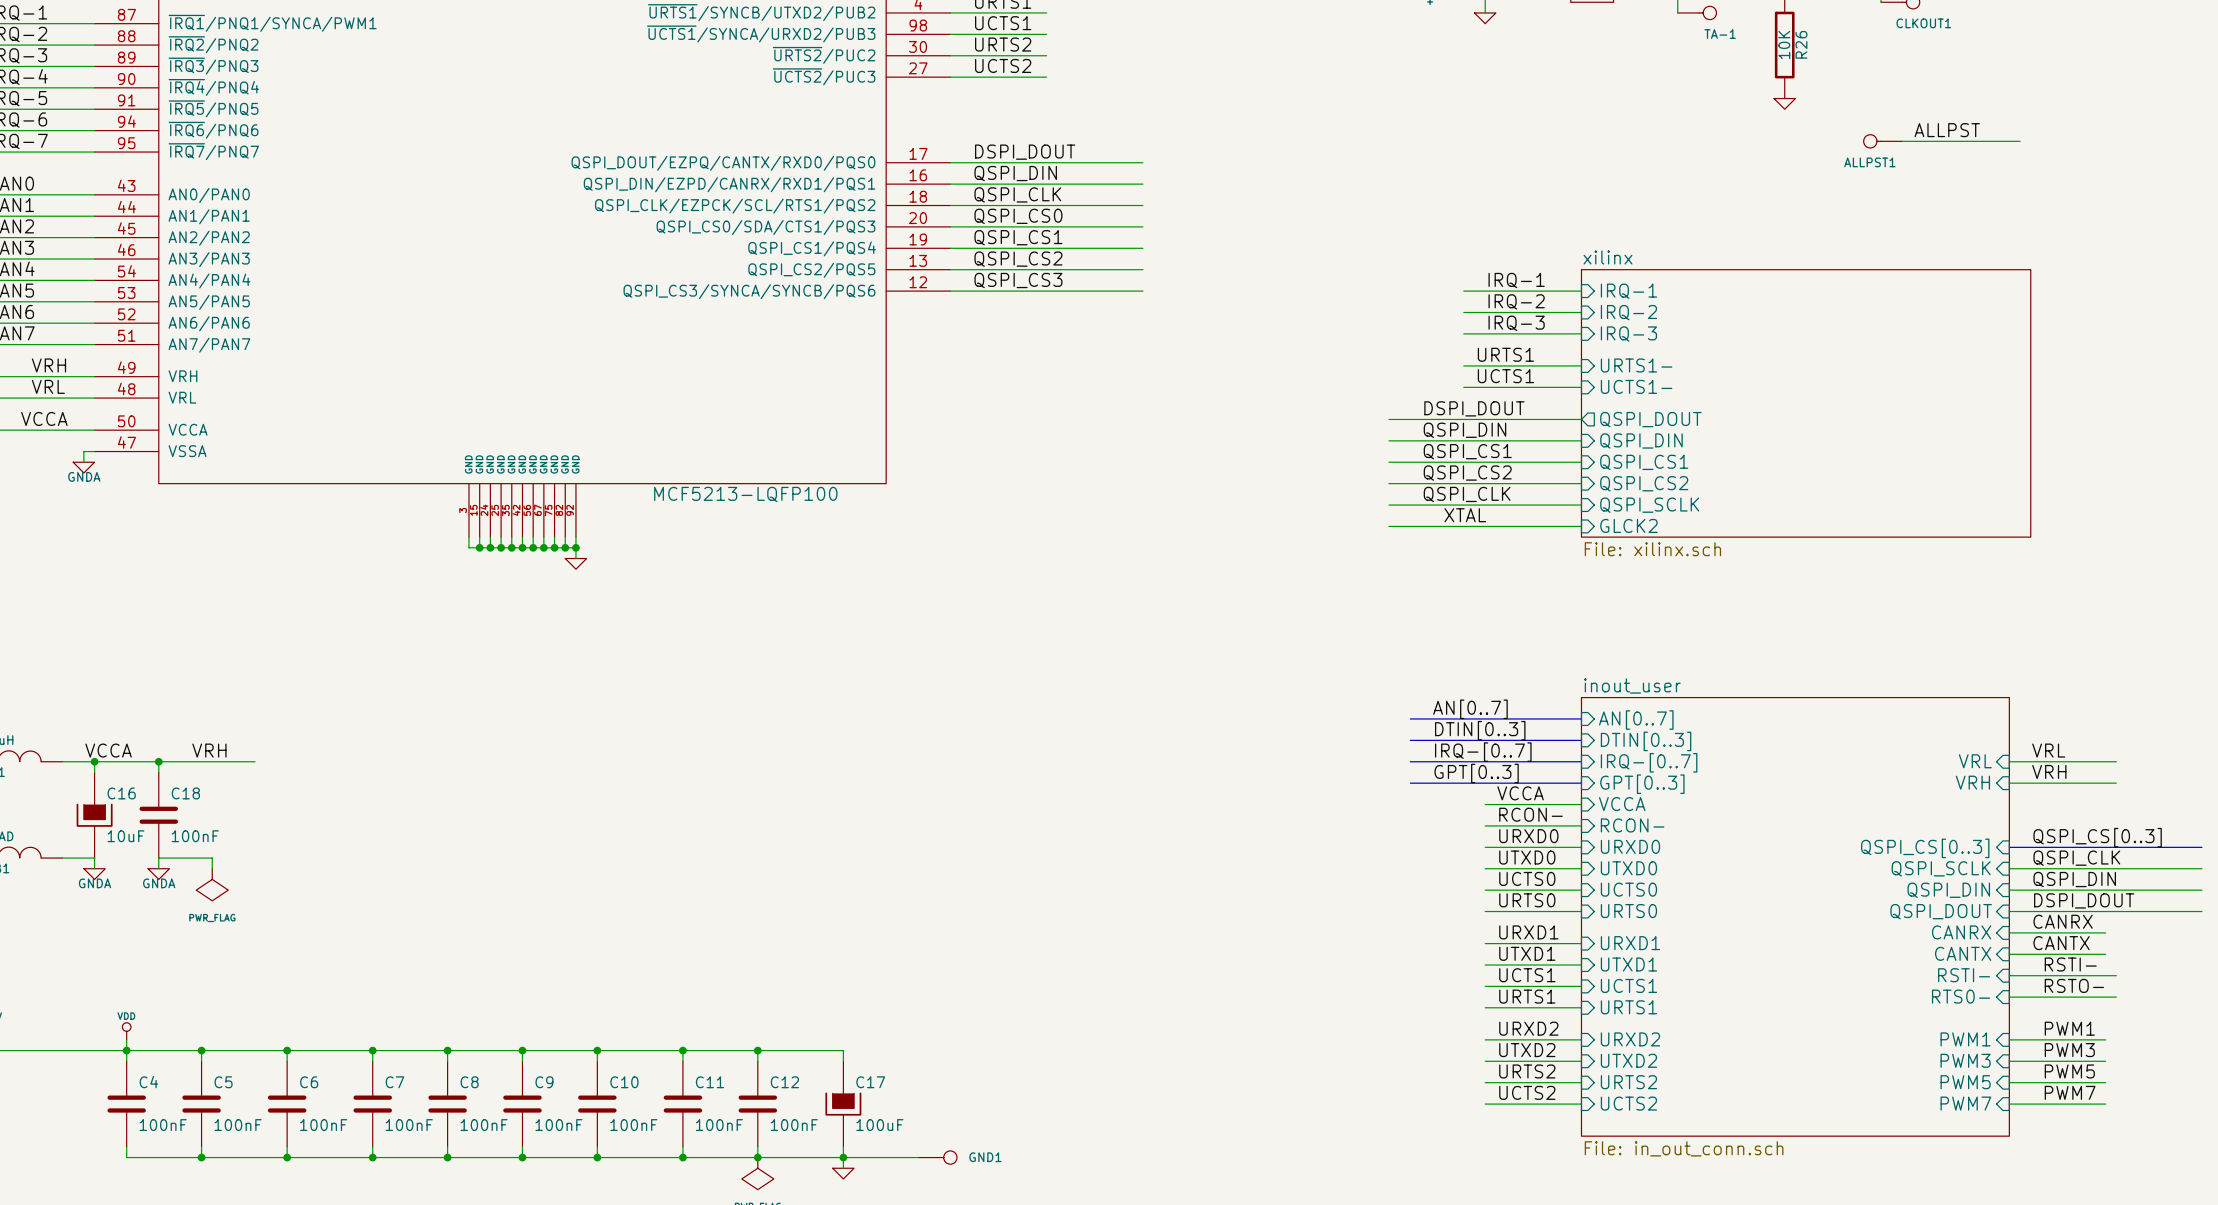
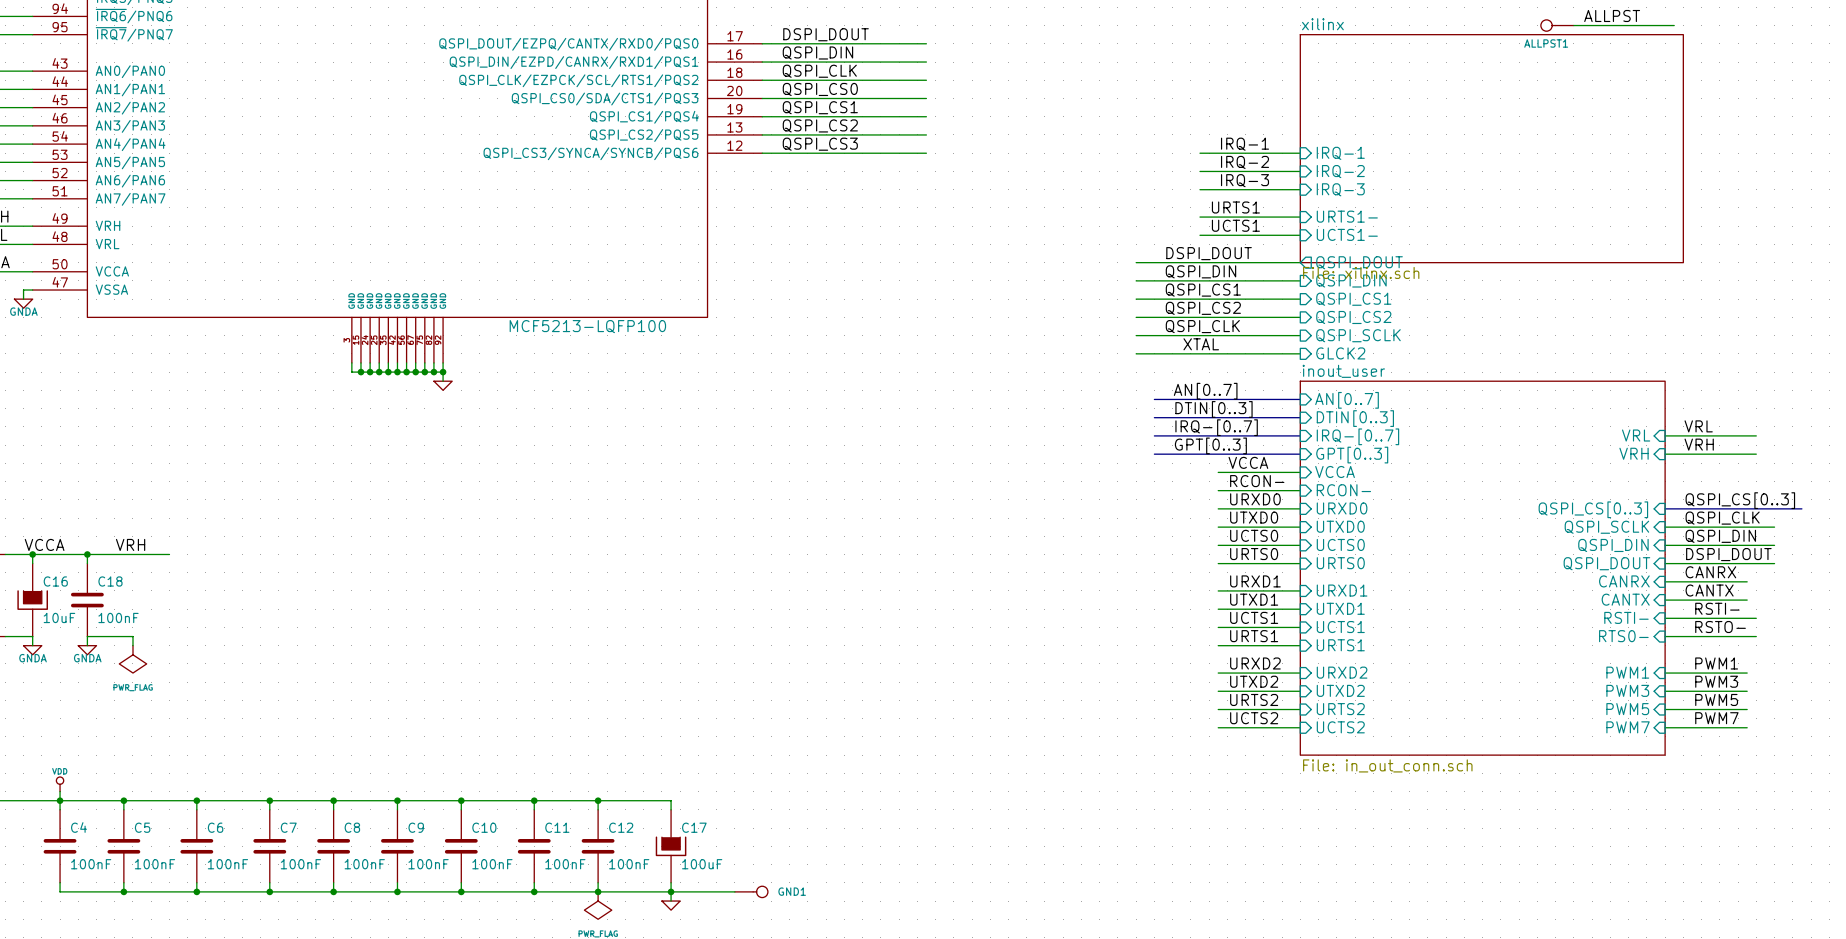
sheet xilinx position: (1806, 403) -> (1491, 148)
label: none -> VCCA (1248, 462)
wire: none -> (1218, 472) (1300, 472)
sheet pin: none -> VCCA (1335, 471)
label: none -> RCON- (1257, 481)
wire: none -> (1218, 490) (1300, 490)
sheet pin: none -> RCON- (1343, 490)
label: none -> URXD0 (1255, 499)
sheet pin: none -> URXD0 (1342, 508)
wire: none -> (1218, 508) (1300, 508)
bus: none -> (1665, 508) (1801, 508)
label position: AN[0..7] (1470, 709) -> AN[0..7] (1205, 391)
bus: (1410, 718) (1581, 718) -> (1154, 399) (1300, 399)
label: none -> UTXD0 (1254, 517)
sheet pin position: AN[0..7] (1636, 720) -> AN[0..7] (1347, 400)
wire: none -> (1218, 527) (1300, 527)
sheet pin: none -> UTXD0 (1340, 526)
wire: none -> (1665, 527) (1774, 527)
label position: DTIN[0..3] (1480, 730) -> DTIN[0..3] (1214, 409)
bus: (1410, 740) (1581, 740) -> (1154, 417) (1300, 417)
sheet pin position: DTIN[0..3] (1646, 741) -> DTIN[0..3] (1355, 418)
label position: VRL (2048, 750) -> VRL (1698, 426)
wire: none -> (1665, 545) (1774, 545)
label position: IRQ-[0..7] (1483, 752) -> IRQ-[0..7] (1216, 427)
bus: (1410, 761) (1581, 761) -> (1154, 435) (1300, 435)
sheet pin position: VRL (1975, 761) -> VRL (1636, 435)
wire: (2009, 761) (2116, 761) -> (1665, 435) (1756, 435)
sheet pin position: IRQ-[0..7] (1649, 762) -> IRQ-[0..7] (1357, 436)
label position: VRH (2049, 771) -> VRH (1699, 444)
wire: none -> (1665, 563) (1774, 563)
label position: GPT[0..3] (1476, 773) -> GPT[0..3] (1210, 445)
sheet pin position: VRH (1972, 782) -> VRH (1634, 453)
bus: (1410, 783) (1581, 783) -> (1154, 454) (1300, 454)
wire: (2009, 783) (2116, 783) -> (1665, 454) (1756, 454)
sheet pin position: GPT[0..3] (1642, 784) -> GPT[0..3] (1352, 455)
label: VCCA (1520, 793) -> URXD1 (1255, 581)
sheet pin: VCCA (1622, 804) -> URXD1 (1342, 590)
label: RCON- (1530, 814) -> UTXD1 (1254, 599)
wire: none -> (1665, 600) (1747, 600)
sheet pin: RCON- (1632, 825) -> UTXD1 (1340, 608)
label: URXD0 (1528, 836) -> UCTS1 (1254, 617)
label position: QSPI_CS[0..3] (2097, 837) -> QSPI_CS[0..3] (1740, 500)
sheet pin: URXD0 (1630, 846) -> UCTS1 (1340, 627)
bus: (2009, 847) (2201, 847) -> none
sheet pin position: QSPI_CS[0..3] (1925, 848) -> QSPI_CS[0..3] (1593, 509)
label: UTXD0 (1527, 857) -> URTS1 (1254, 636)
label position: QSPI_CLK (2076, 858) -> QSPI_CLK (1722, 518)
sheet pin: UTXD0 (1628, 868) -> URTS1 (1340, 645)
sheet pin position: QSPI_SCLK (1941, 868) -> QSPI_SCLK (1606, 527)
wire: (2009, 868) (2201, 868) -> none
label position: UCTS0 (1527, 878) -> UCTS0 (1254, 535)
label position: QSPI_DIN (2074, 879) -> QSPI_DIN (1720, 536)
sheet pin position: UCTS0 (1628, 889) -> UCTS0 (1340, 544)
wire: (1485, 890) (1581, 890) -> (1218, 545) (1300, 545)
sheet pin position: QSPI_DIN (1948, 890) -> QSPI_DIN (1613, 545)
wire: (2009, 890) (2201, 890) -> none
label position: URTS0 (1527, 900) -> URTS0 (1254, 554)
label position: DSPI_DOUT (2084, 900) -> DSPI_DOUT (1728, 554)
wire: (1485, 911) (1581, 911) -> (1218, 563) (1300, 563)
sheet pin position: URTS0 (1628, 911) -> URTS0 (1340, 563)
sheet pin position: QSPI_DOUT (1941, 911) -> QSPI_DOUT (1606, 563)
wire: (2009, 911) (2201, 911) -> none
sheet inout_user position: (1795, 916) -> (1482, 568)
label position: CANRX (2063, 921) -> CANRX (1710, 572)
label: URXD1 (1528, 932) -> URTS2 (1254, 699)
sheet pin position: CANRX (1961, 932) -> CANRX (1624, 581)
wire: (2009, 932) (2105, 932) -> (1665, 581) (1747, 581)
sheet pin: URXD1 (1630, 943) -> URTS2 (1340, 709)
label position: CANTX (2061, 943) -> CANTX (1709, 590)
label: UTXD1 (1527, 953) -> UCTS2 (1254, 718)
sheet pin position: CANTX (1963, 953) -> CANTX (1625, 599)
wire: (2009, 954) (2105, 954) -> (1665, 673) (1747, 673)
sheet pin: UTXD1 (1628, 964) -> UCTS2 (1340, 727)
label position: RSTI- (2070, 964) -> RSTI- (1717, 608)
label: UCTS1 (1527, 975) -> none
sheet pin position: RSTI- (1964, 975) -> RSTI- (1626, 617)
wire: (2009, 975) (2116, 975) -> (1665, 618) (1756, 618)
sheet pin: UCTS1 (1628, 985) -> none
label position: RSTO- (2074, 985) -> RSTO- (1720, 627)
wire: (1485, 986) (1581, 986) -> none
label: URTS1 (1527, 996) -> none
sheet pin position: RTS0- (1960, 996) -> RTS0- (1623, 636)
wire: (2009, 997) (2116, 997) -> (1665, 636) (1756, 636)
wire: (1485, 1007) (1581, 1007) -> none
sheet pin: URTS1 (1628, 1007) -> none
label position: URXD2 (1528, 1028) -> URXD2 (1255, 663)
label position: PWM1 (2069, 1028) -> PWM1 (1716, 663)
wire: (1485, 1039) (1581, 1039) -> (1218, 673) (1300, 673)
sheet pin position: URXD2 (1630, 1039) -> URXD2 (1342, 672)
sheet pin position: PWM1 (1965, 1039) -> PWM1 (1627, 672)
wire: (2009, 1039) (2105, 1039) -> none
label position: UTXD2 (1527, 1050) -> UTXD2 (1254, 681)
label position: PWM3 (2069, 1050) -> PWM3 (1716, 681)
sheet pin position: UTXD2 (1628, 1060) -> UTXD2 (1340, 690)
sheet pin position: PWM3 (1965, 1060) -> PWM3 (1627, 690)
wire: (1485, 1061) (1581, 1061) -> (1218, 691) (1300, 691)
wire: (2009, 1061) (2105, 1061) -> (1665, 691) (1747, 691)
label: URTS2 (1527, 1071) -> none
label position: PWM5 (2069, 1071) -> PWM5 (1716, 699)
wire: (1485, 1082) (1581, 1082) -> none
sheet pin: URTS2 (1628, 1082) -> none
sheet pin position: PWM5 (1965, 1082) -> PWM5 (1627, 709)
wire: (2009, 1082) (2105, 1082) -> (1665, 709) (1747, 709)
label: UCTS2 (1527, 1092) -> none
label position: PWM7 (2070, 1092) -> PWM7 (1716, 718)
sheet pin: UCTS2 (1628, 1103) -> none
sheet pin position: PWM7 (1965, 1103) -> PWM7 (1628, 727)
wire: (1485, 1104) (1581, 1104) -> none
wire: (2009, 1104) (2105, 1104) -> (1665, 727) (1747, 727)

